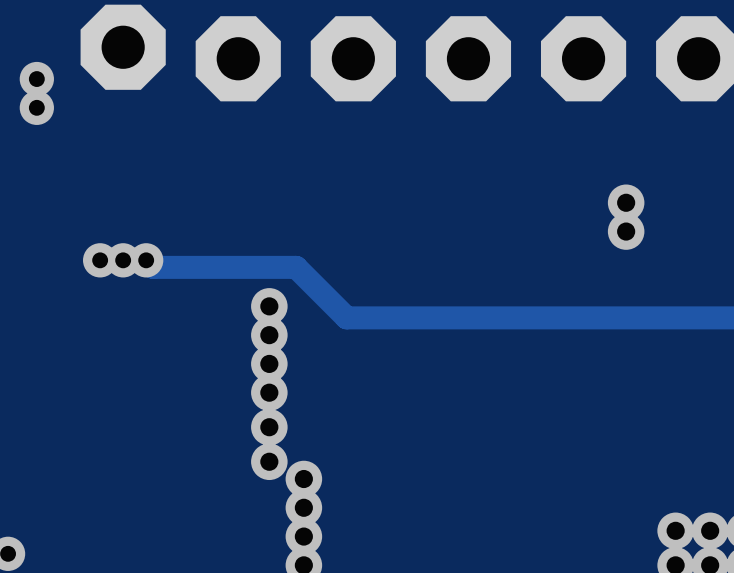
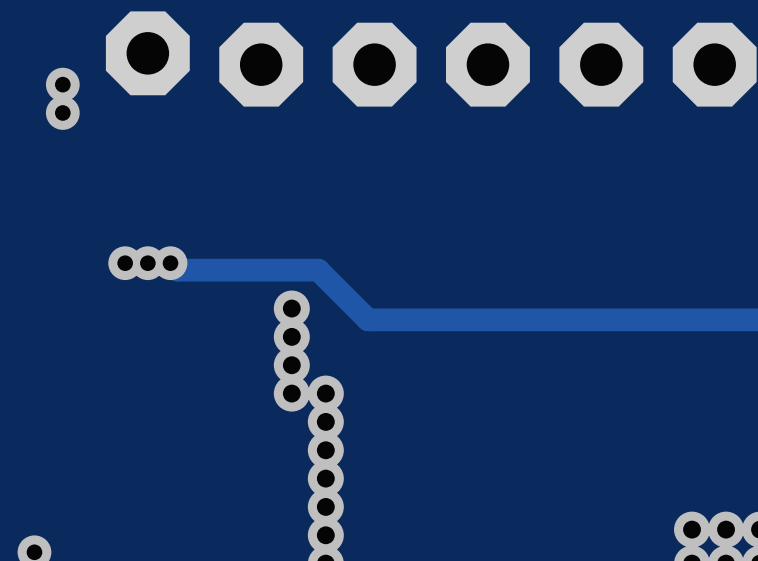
via: (626, 202) -> none
via: (626, 231) -> none
via: none -> (325, 393)
via: none -> (325, 421)
via: (269, 427) -> none
via: none -> (325, 450)
via: (269, 461) -> none

